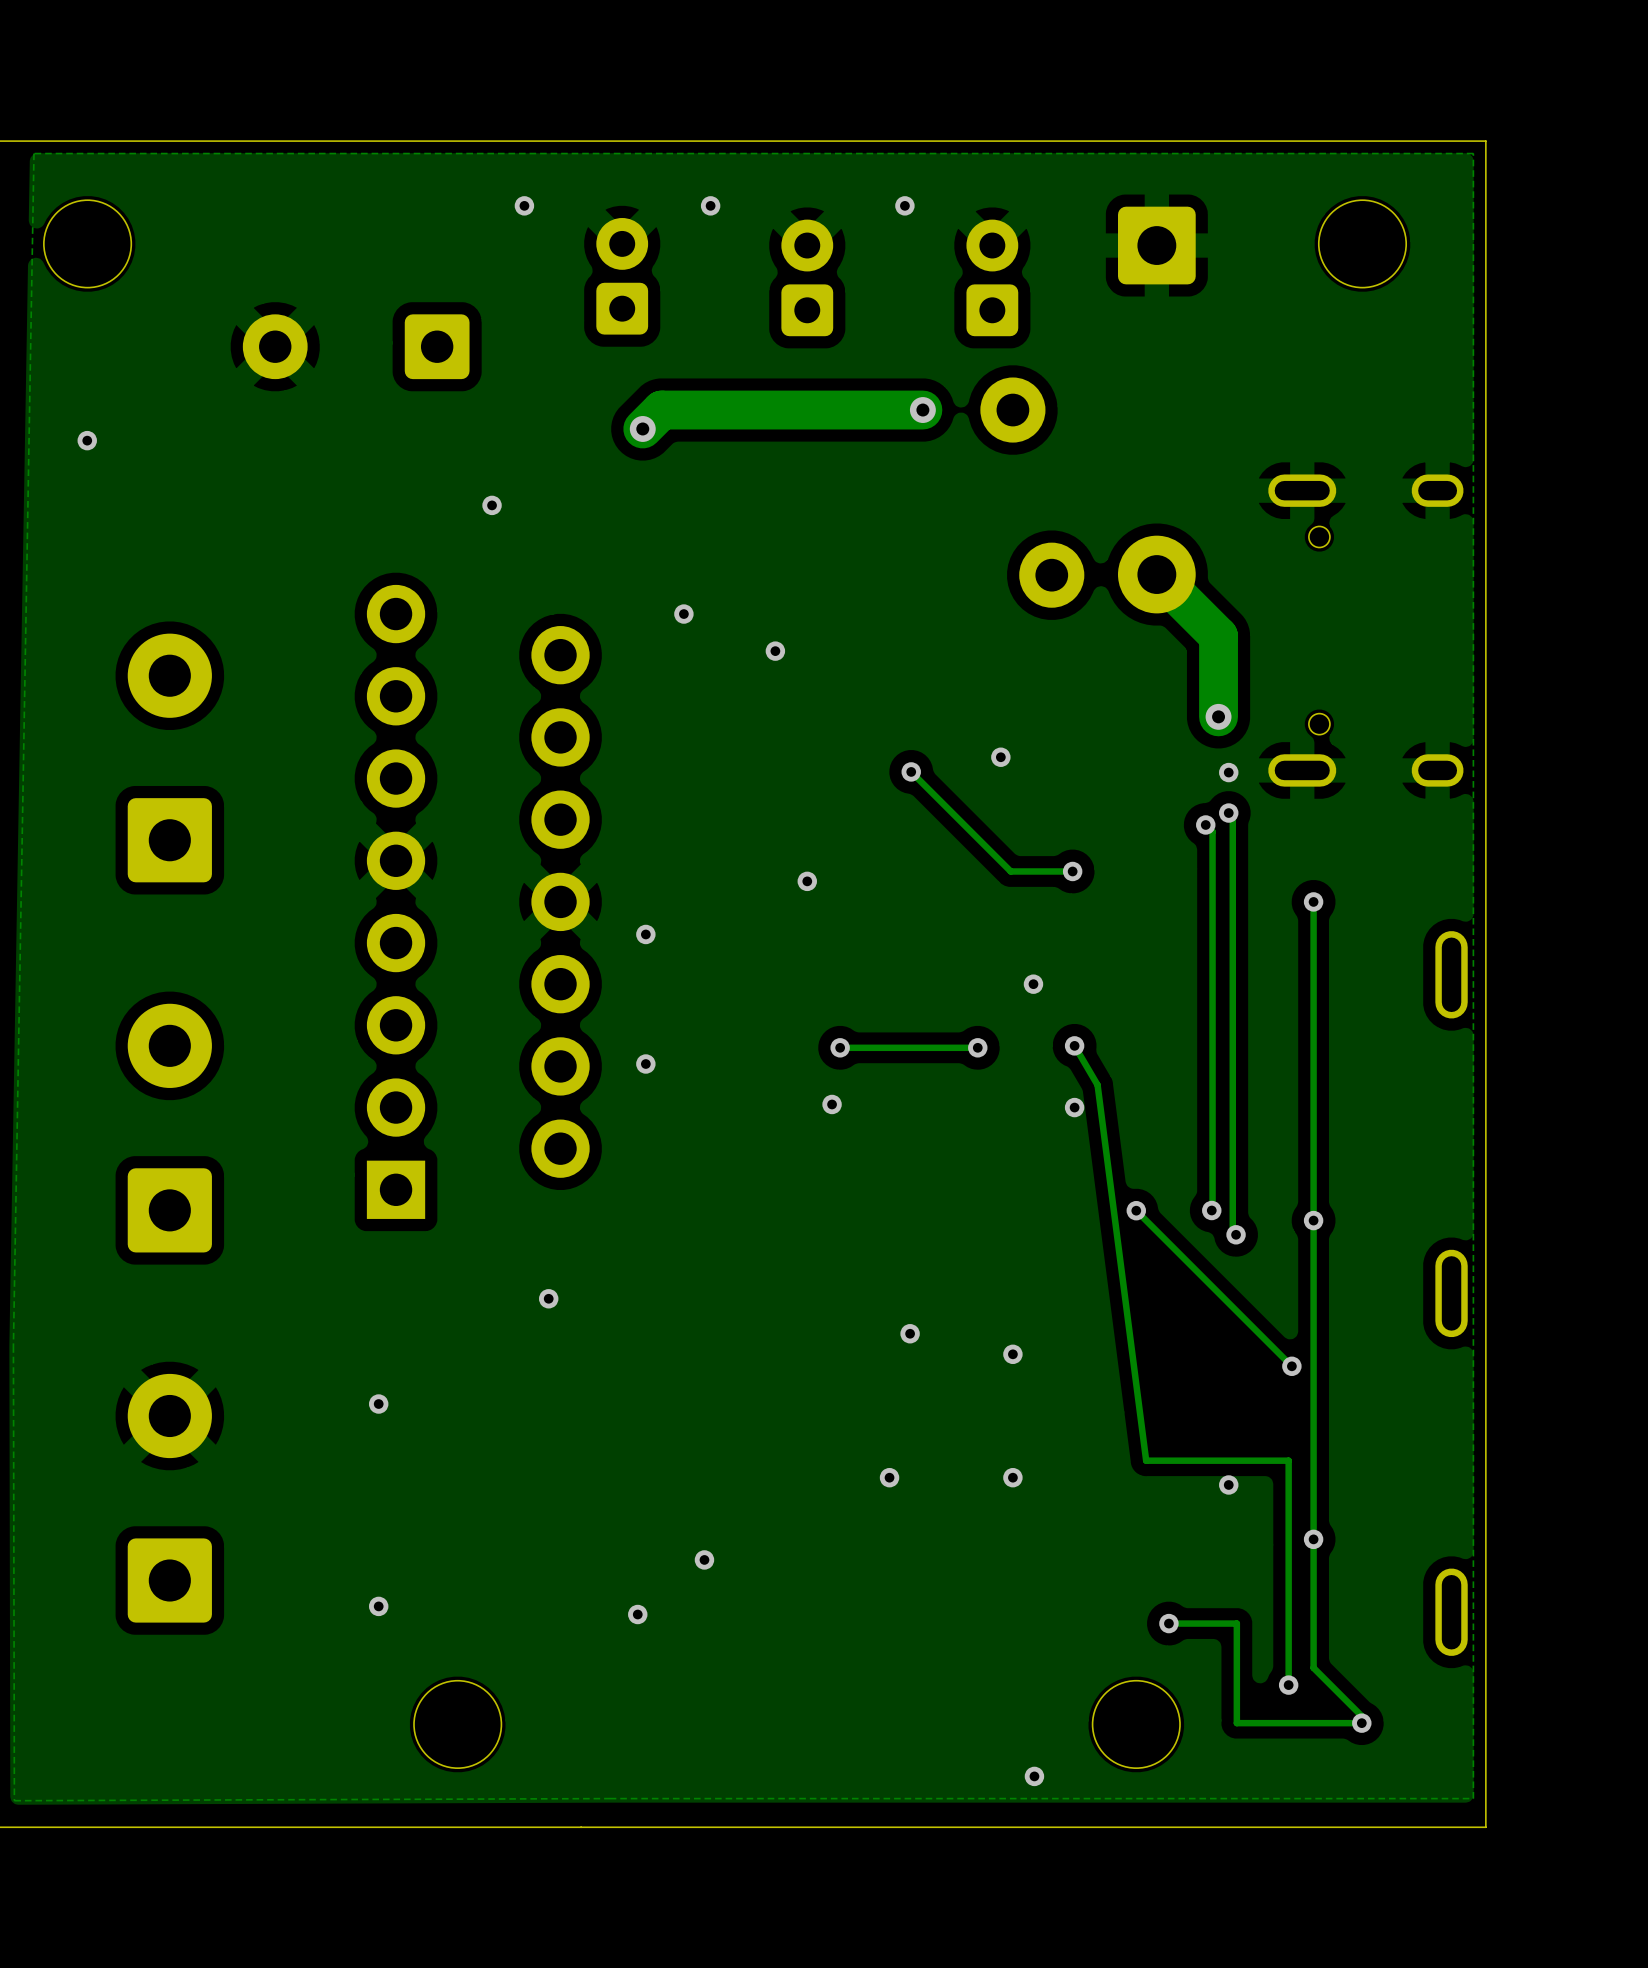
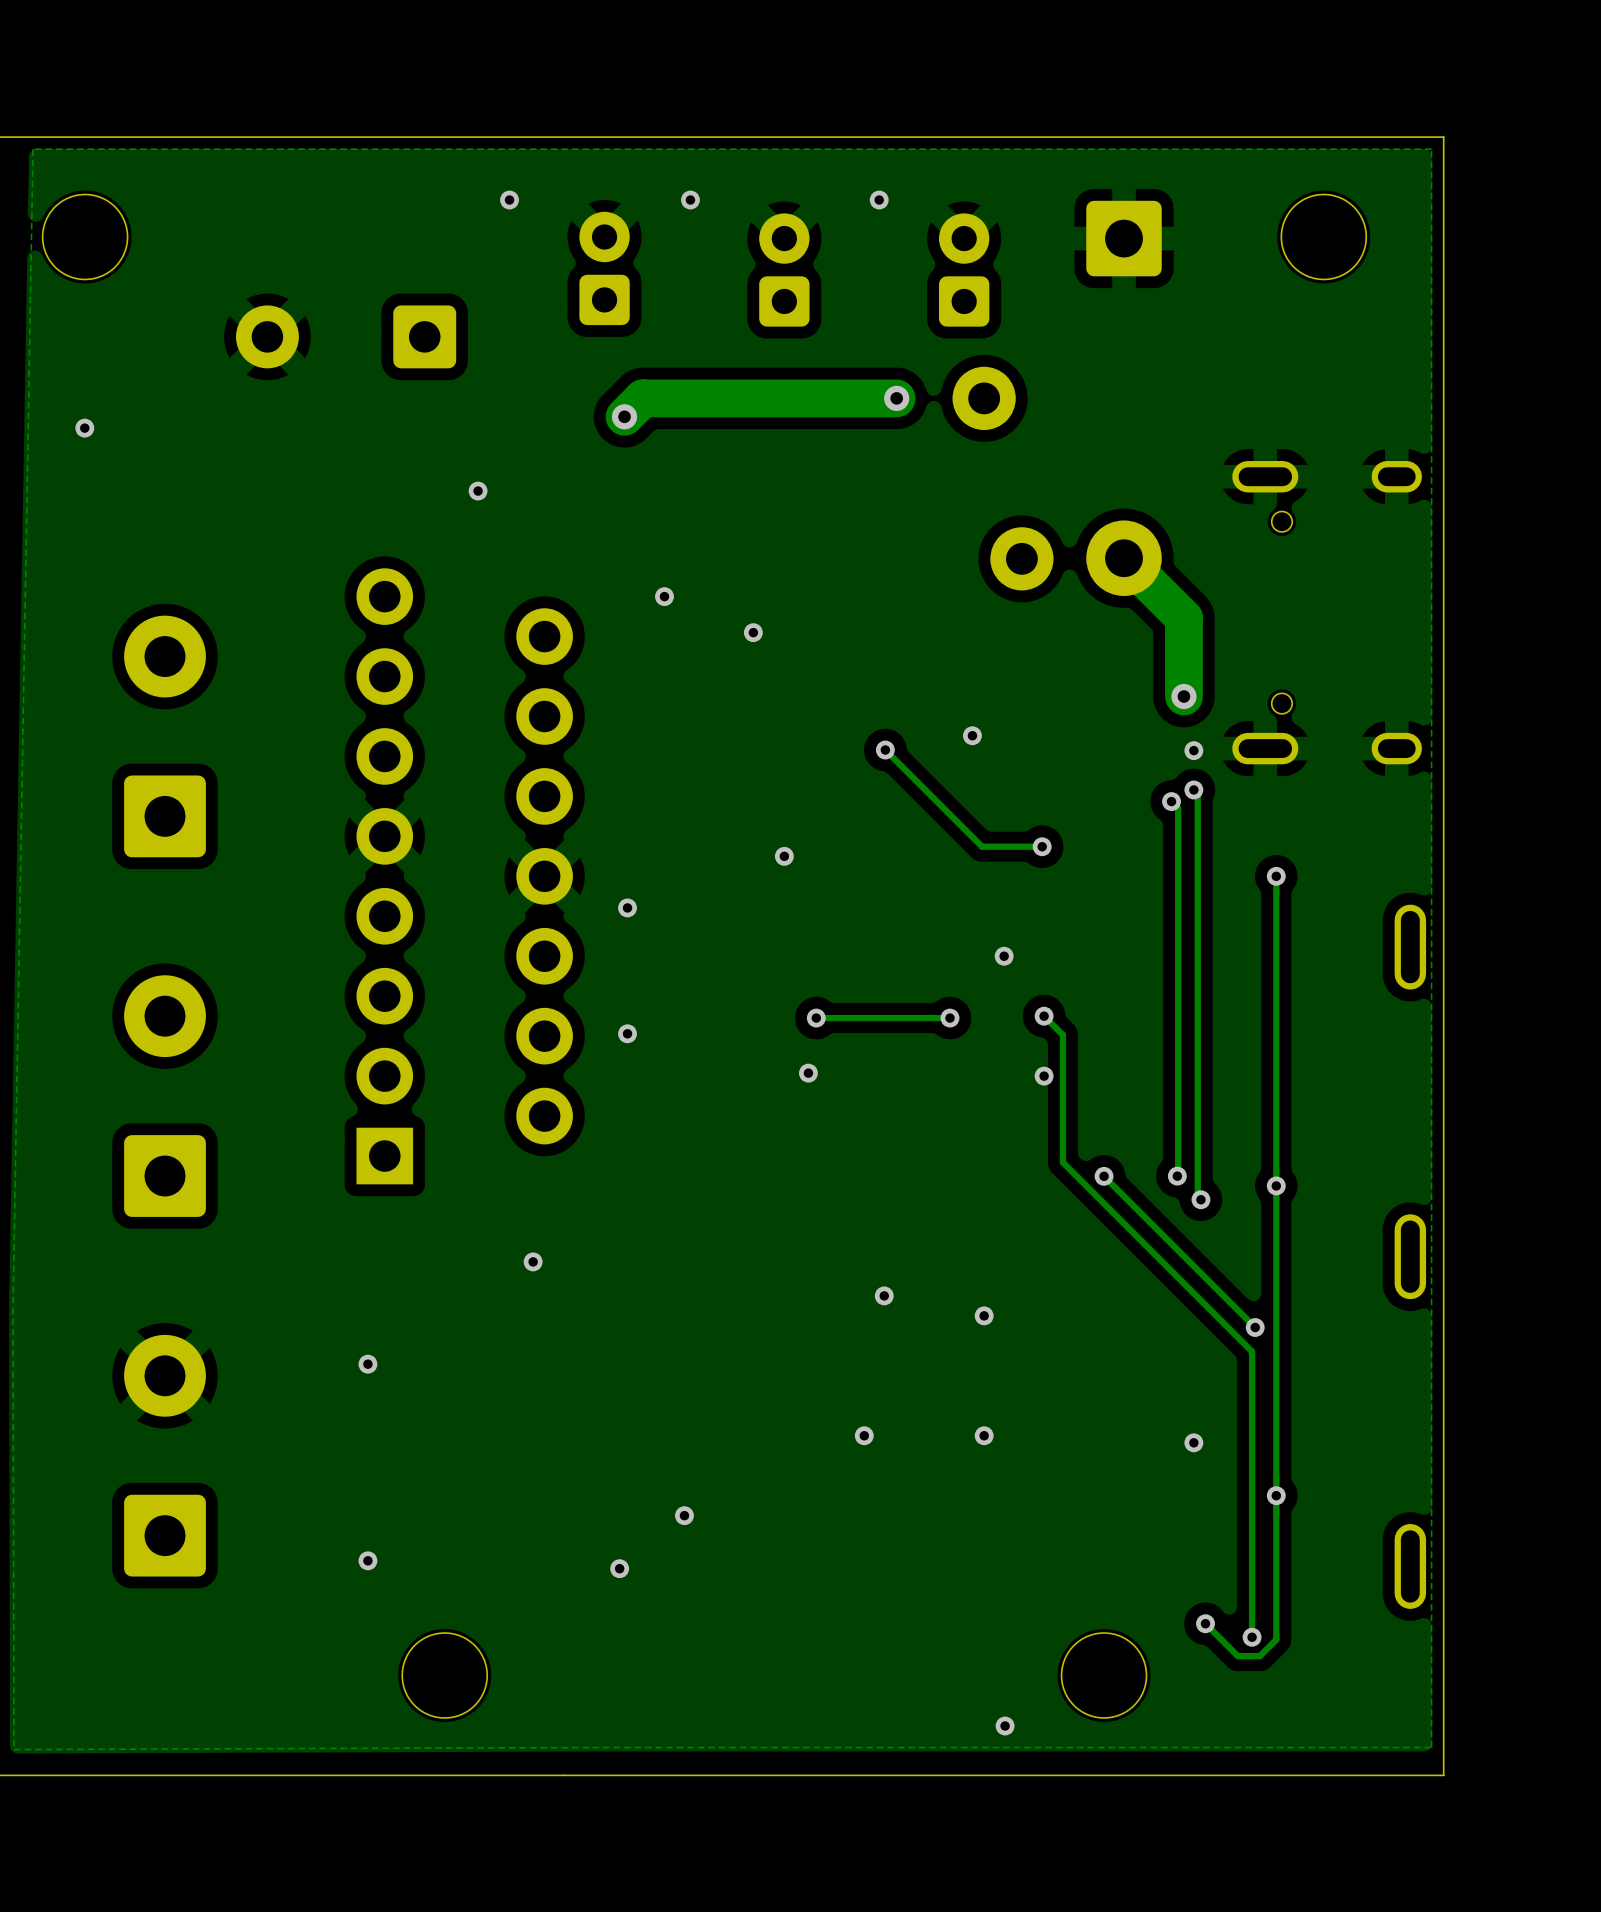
track: (1074, 1045) (1097, 1085) (1146, 1460) (1288, 1460) -> (1044, 1016) (1062, 1035) (1062, 1162) (1252, 1351) (1252, 1419)
track: (1168, 1623) (1236, 1623) (1236, 1723) (1361, 1723) (1361, 1716) (1313, 1667) -> (1205, 1623) (1237, 1656) (1259, 1656) (1276, 1639) (1276, 1620)
via: (1168, 1623) -> none
via: none -> (1205, 1623)
via: (1361, 1723) -> none

